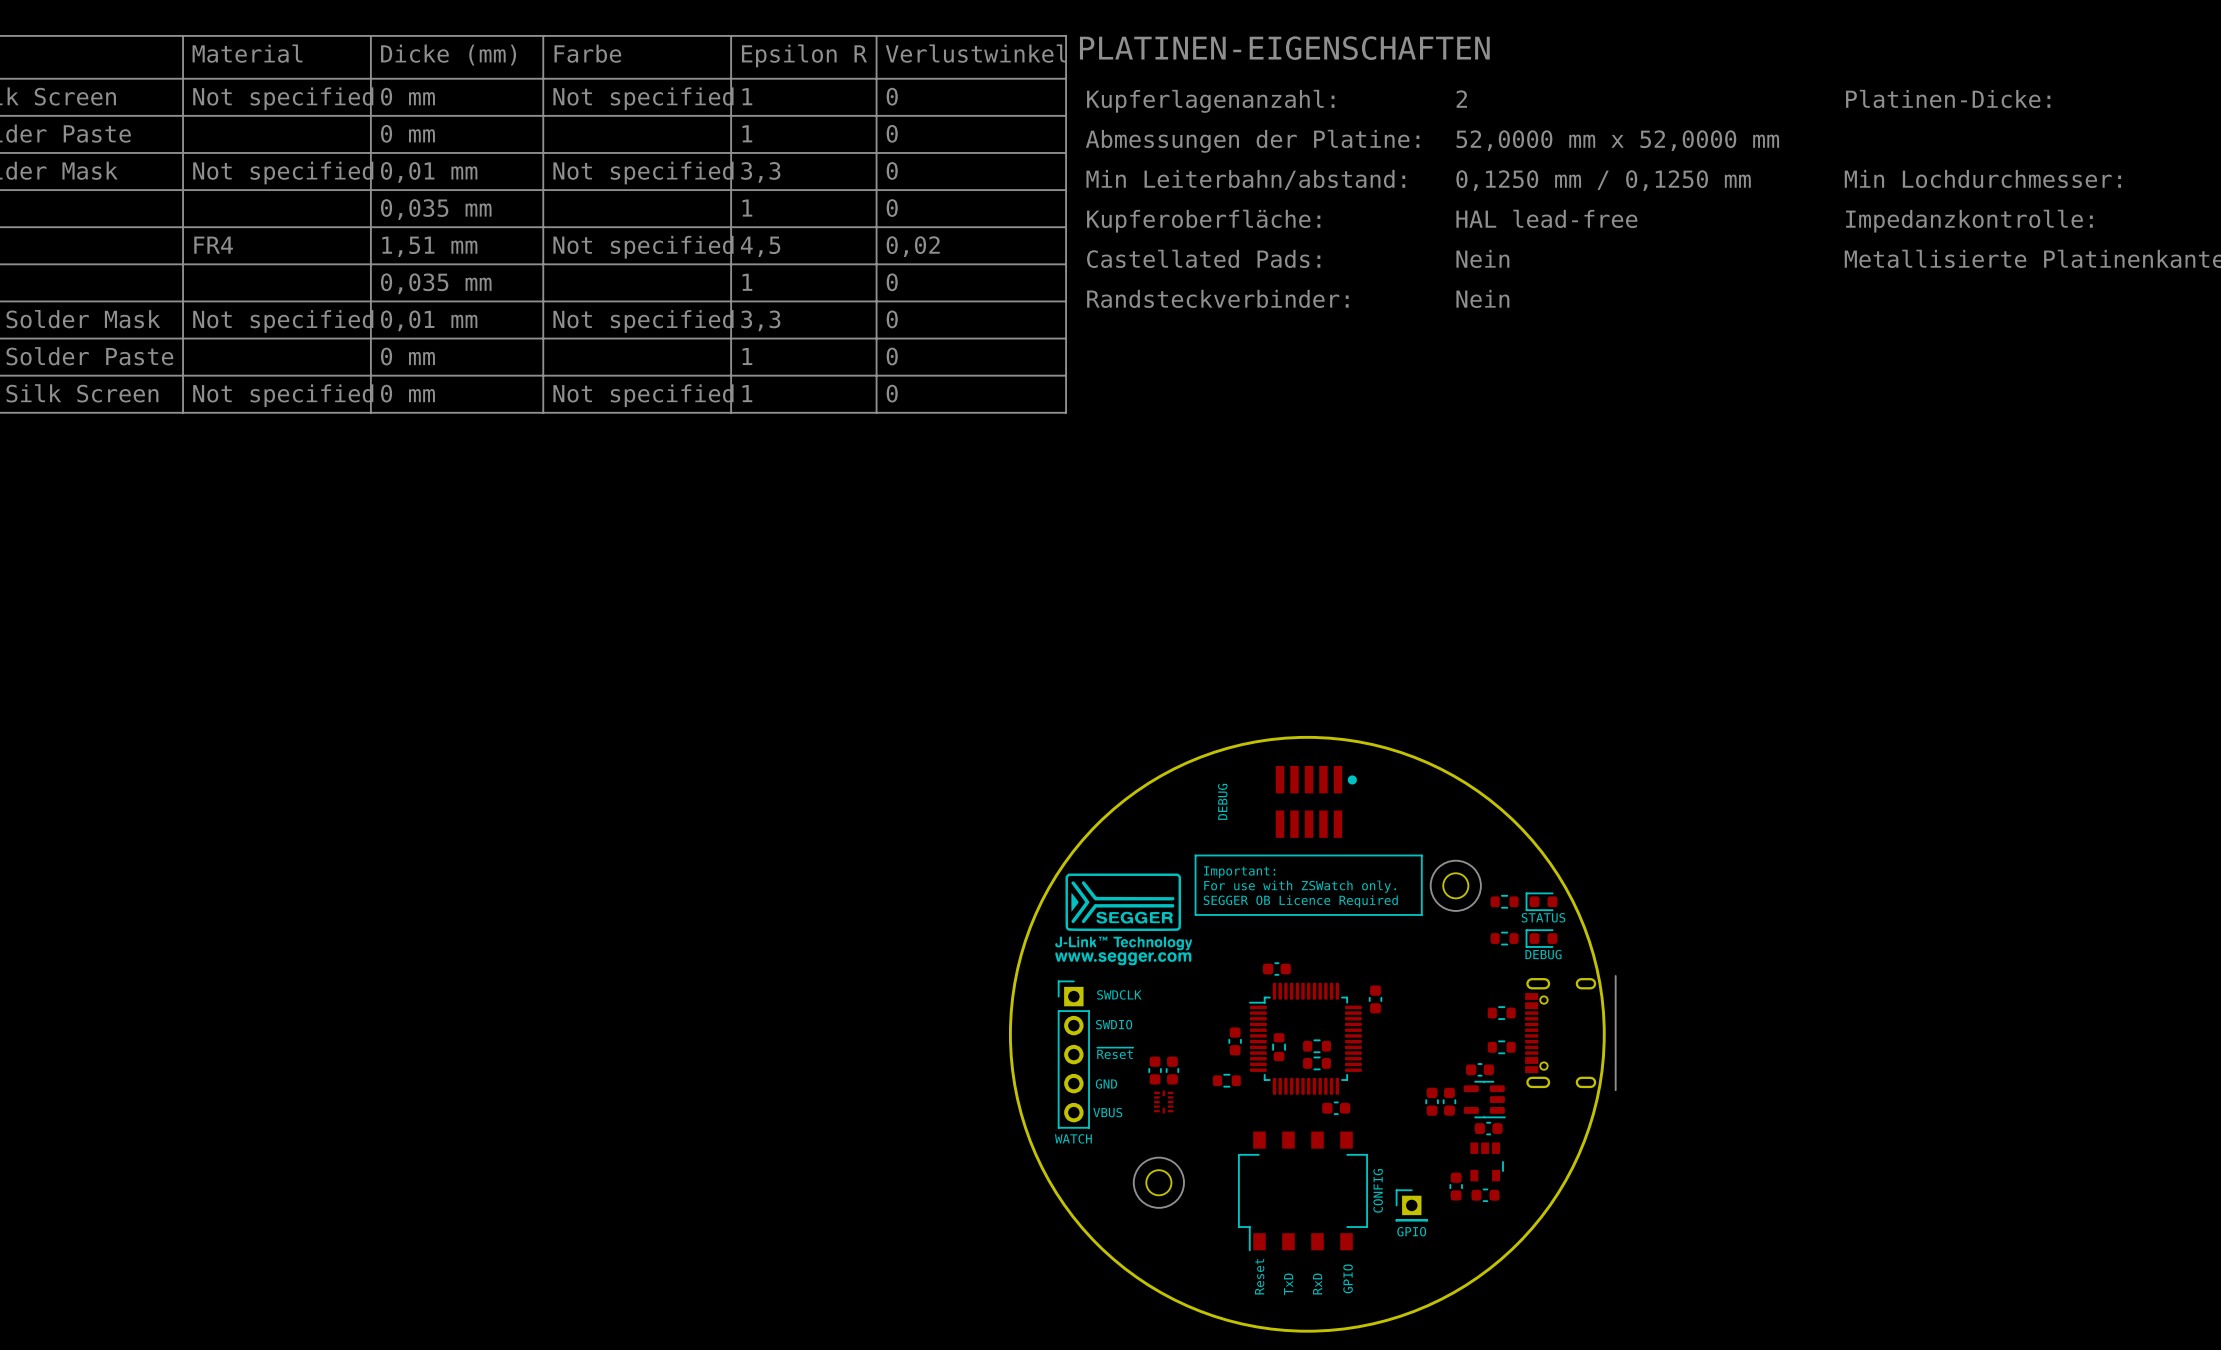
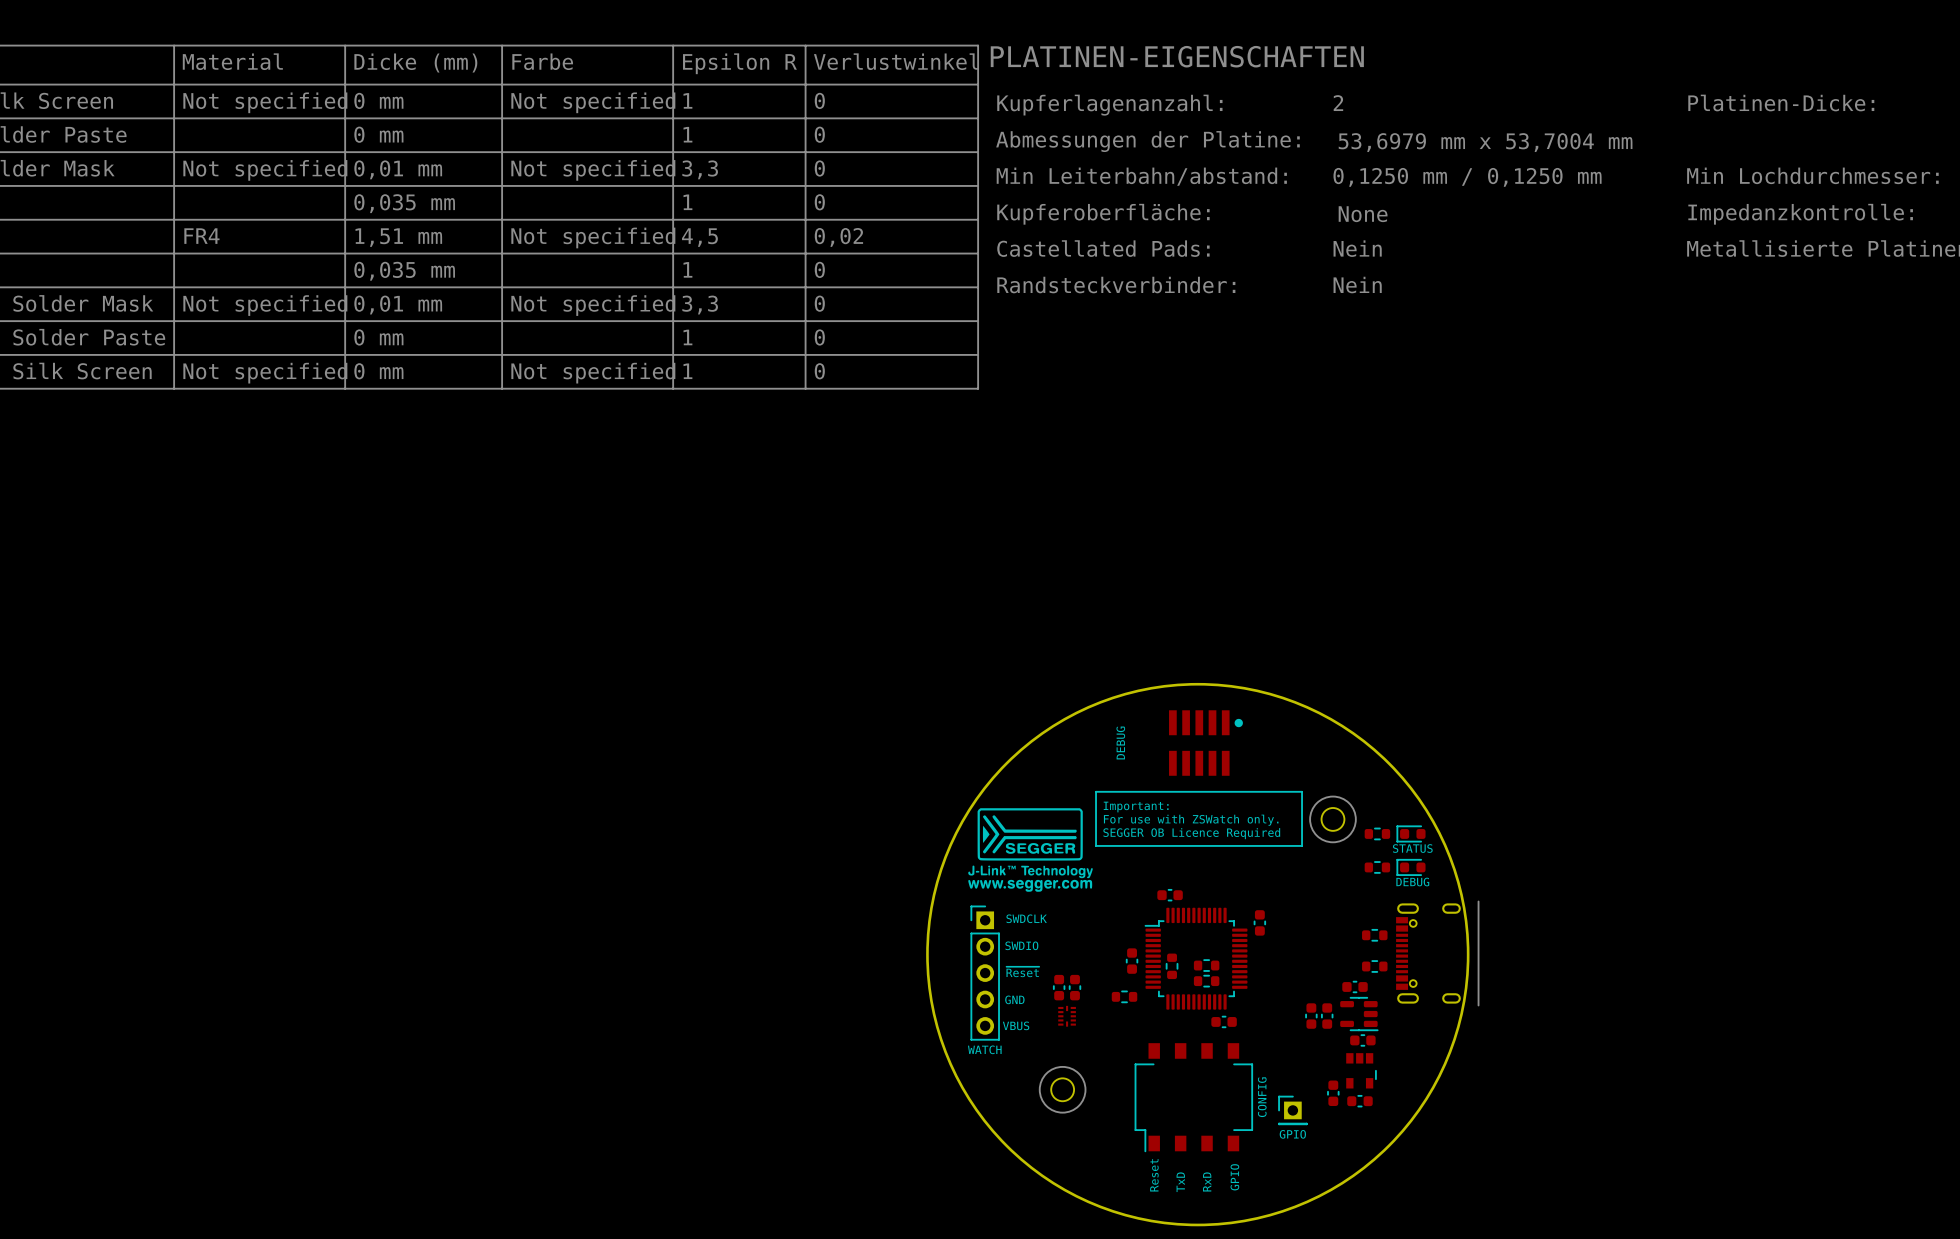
text: 52,0000 mm x 52,0000 mm (1617, 140) -> 53,6979 mm x 53,7004 mm (1485, 142)
text: HAL lead-free (1546, 218) -> None (1363, 214)

